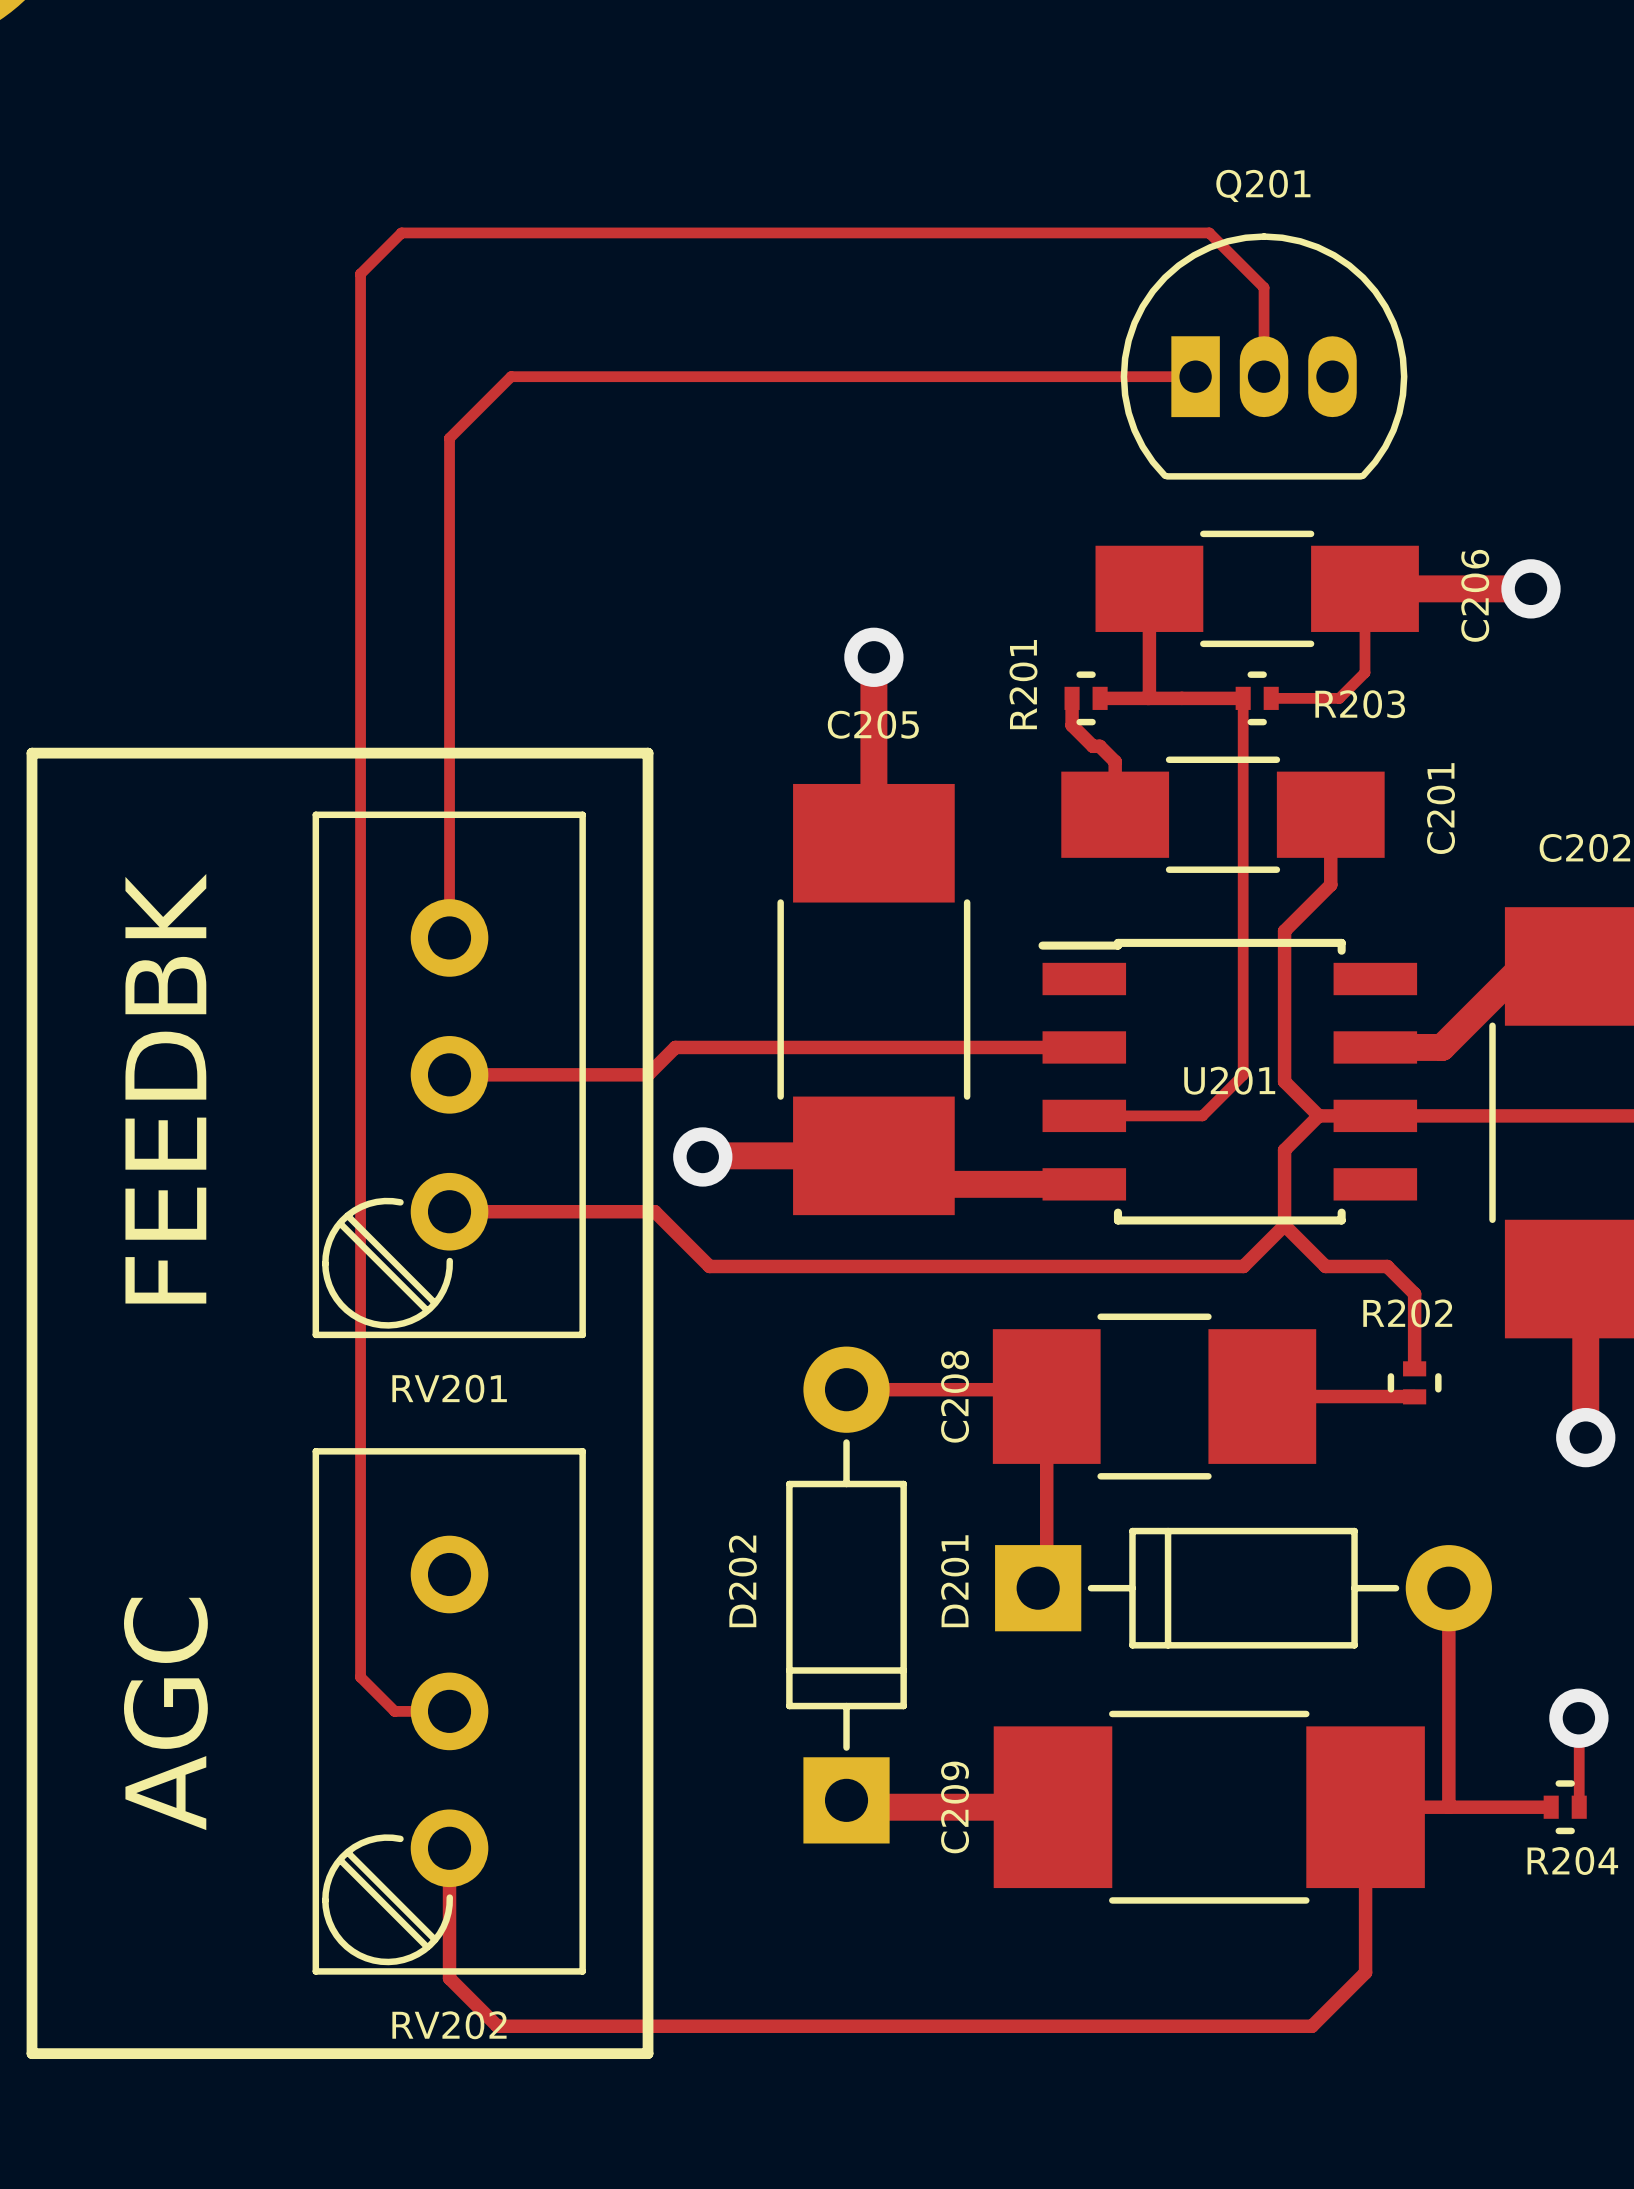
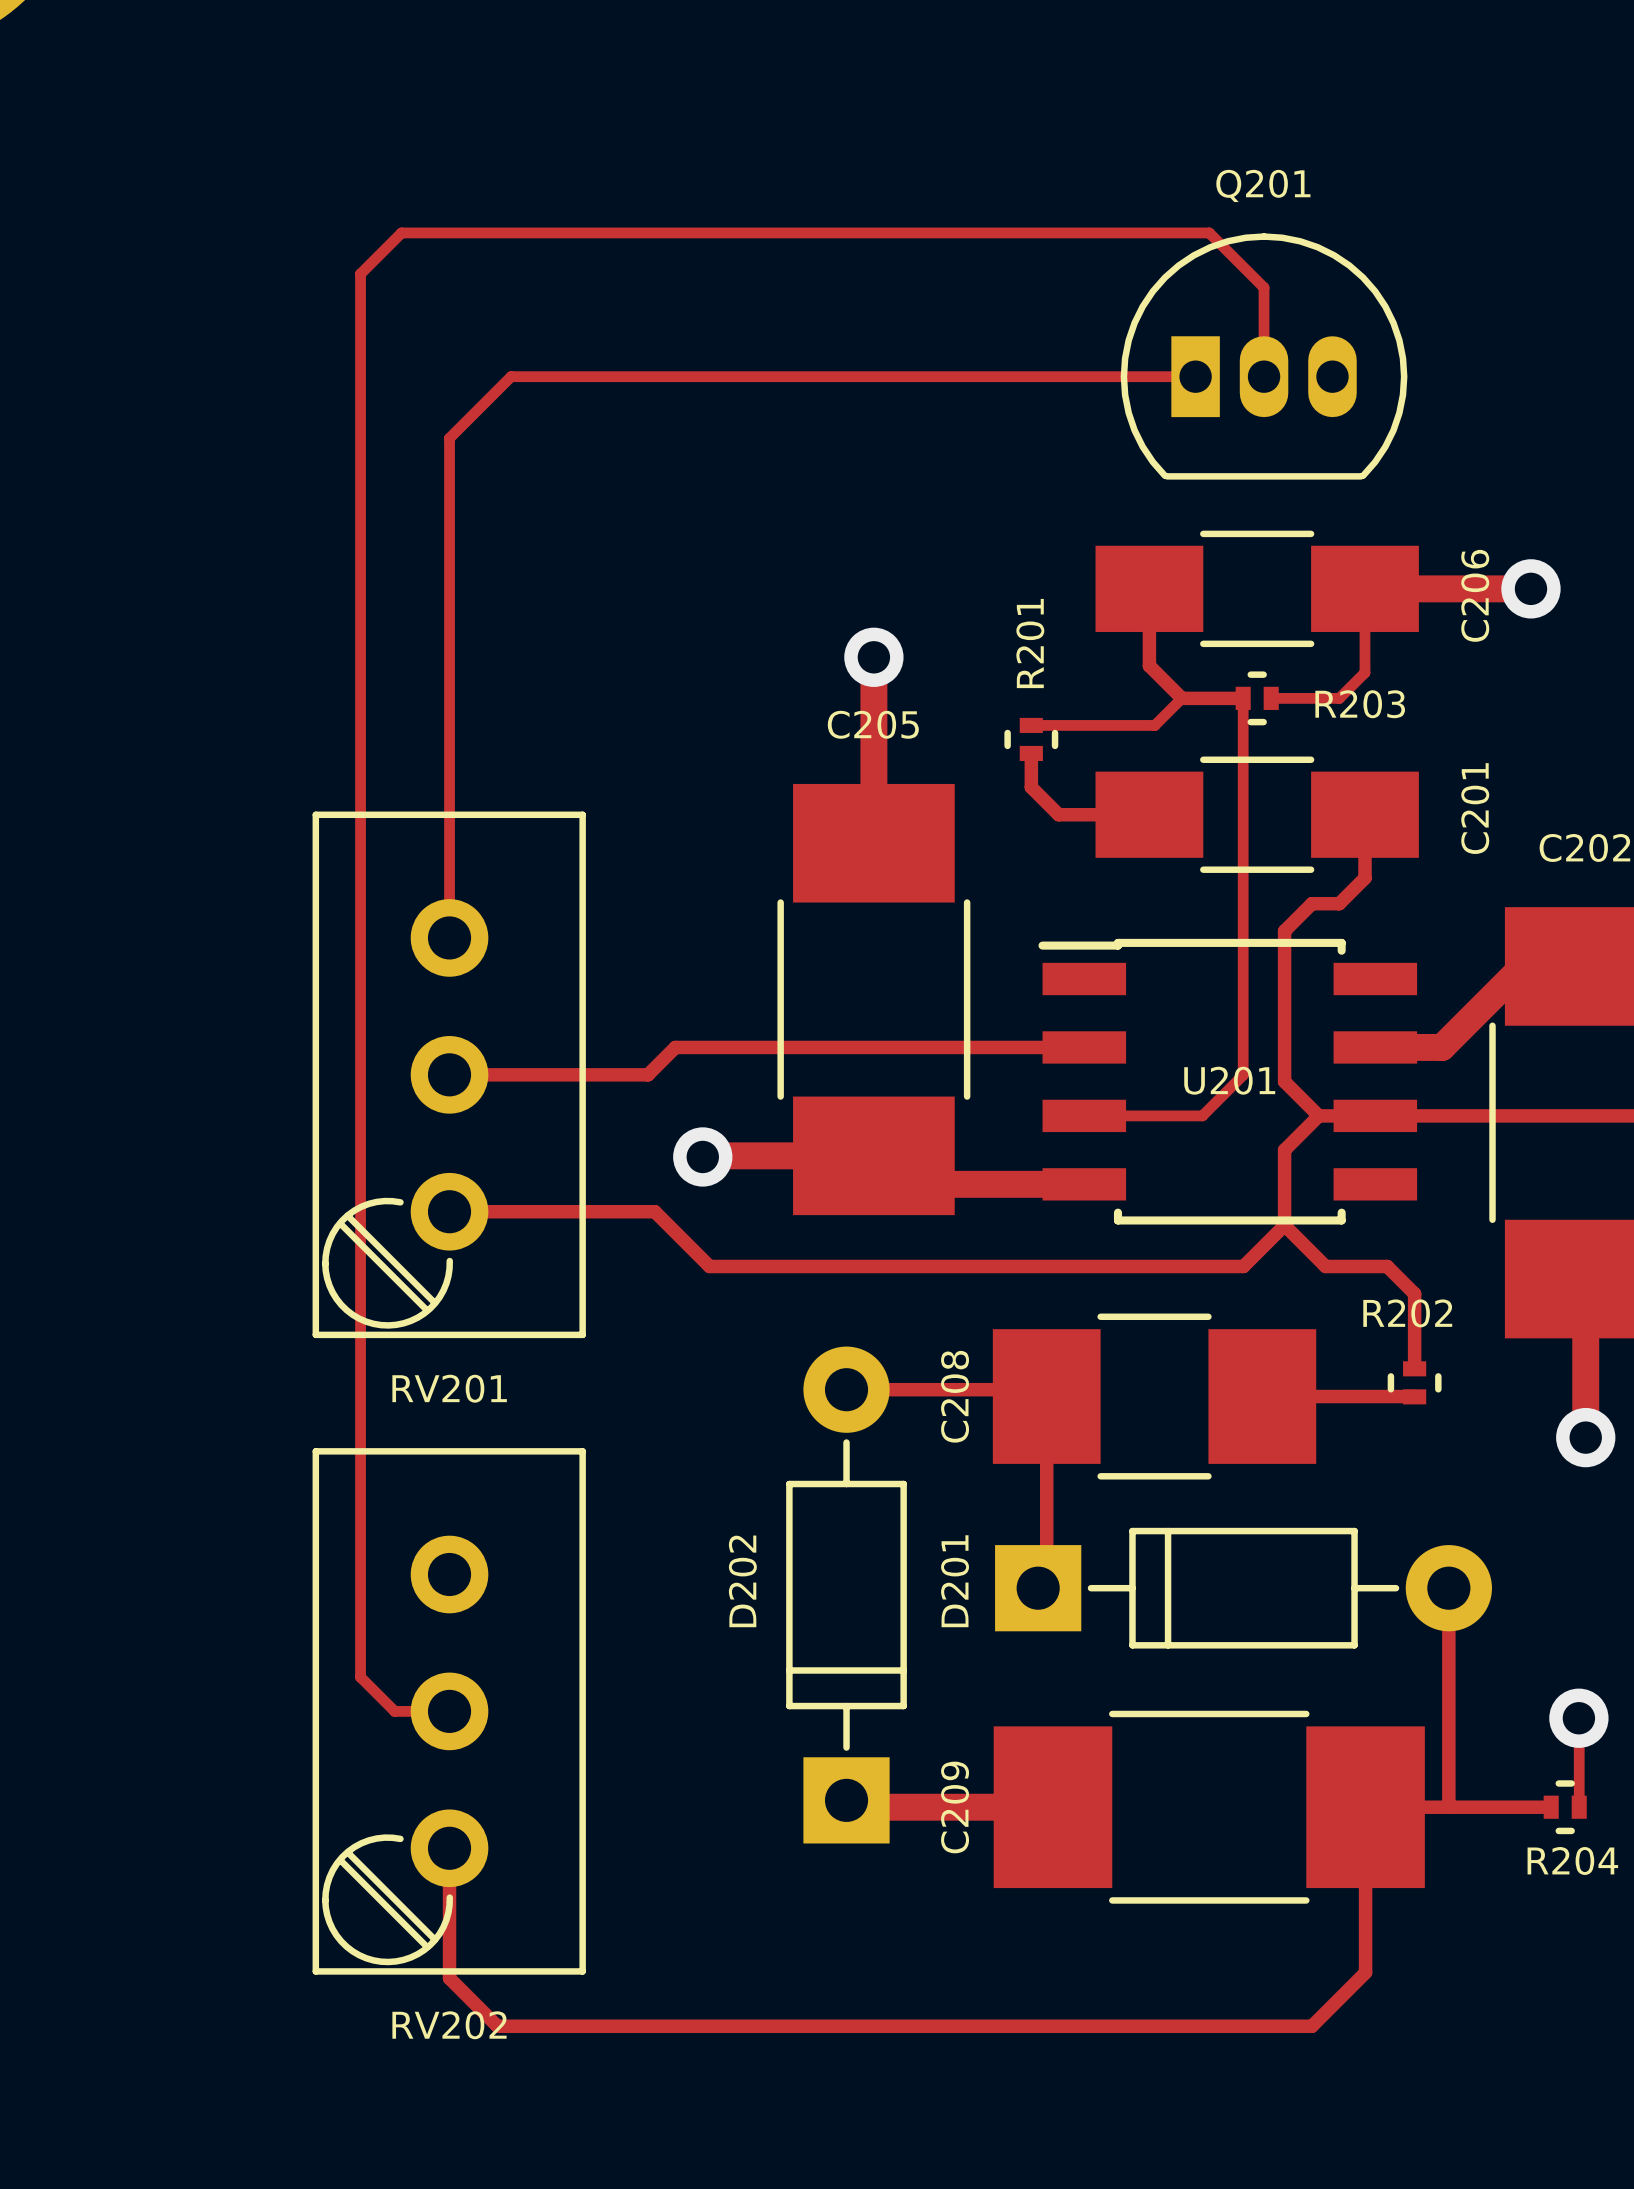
track: (1149, 665) (1149, 698) -> (1149, 665) (1181, 698) (1154, 725) (1031, 725)
track: (1072, 698) (1072, 725) (1092, 746) (1099, 746) (1115, 761) (1115, 814) -> none
R201 rotation: 0° (1086, 698) -> 90° clockwise (1031, 739)
R201 position: (1086, 698) -> (1031, 739)
track: (1100, 698) (1181, 698) -> none
line: (32, 753) (32, 2053) (648, 2053) (648, 753) (32, 753) -> none
track: none -> (1031, 753) (1031, 787) (1058, 814) (1149, 814)
C201 position: (1222, 814) -> (1257, 814)
track: (1330, 814) (1330, 884) (1311, 903) -> (1364, 814) (1364, 878) (1339, 903) (1311, 903)
text: FEEDBK (165, 1088) -> none
text: AGC (165, 1713) -> none

